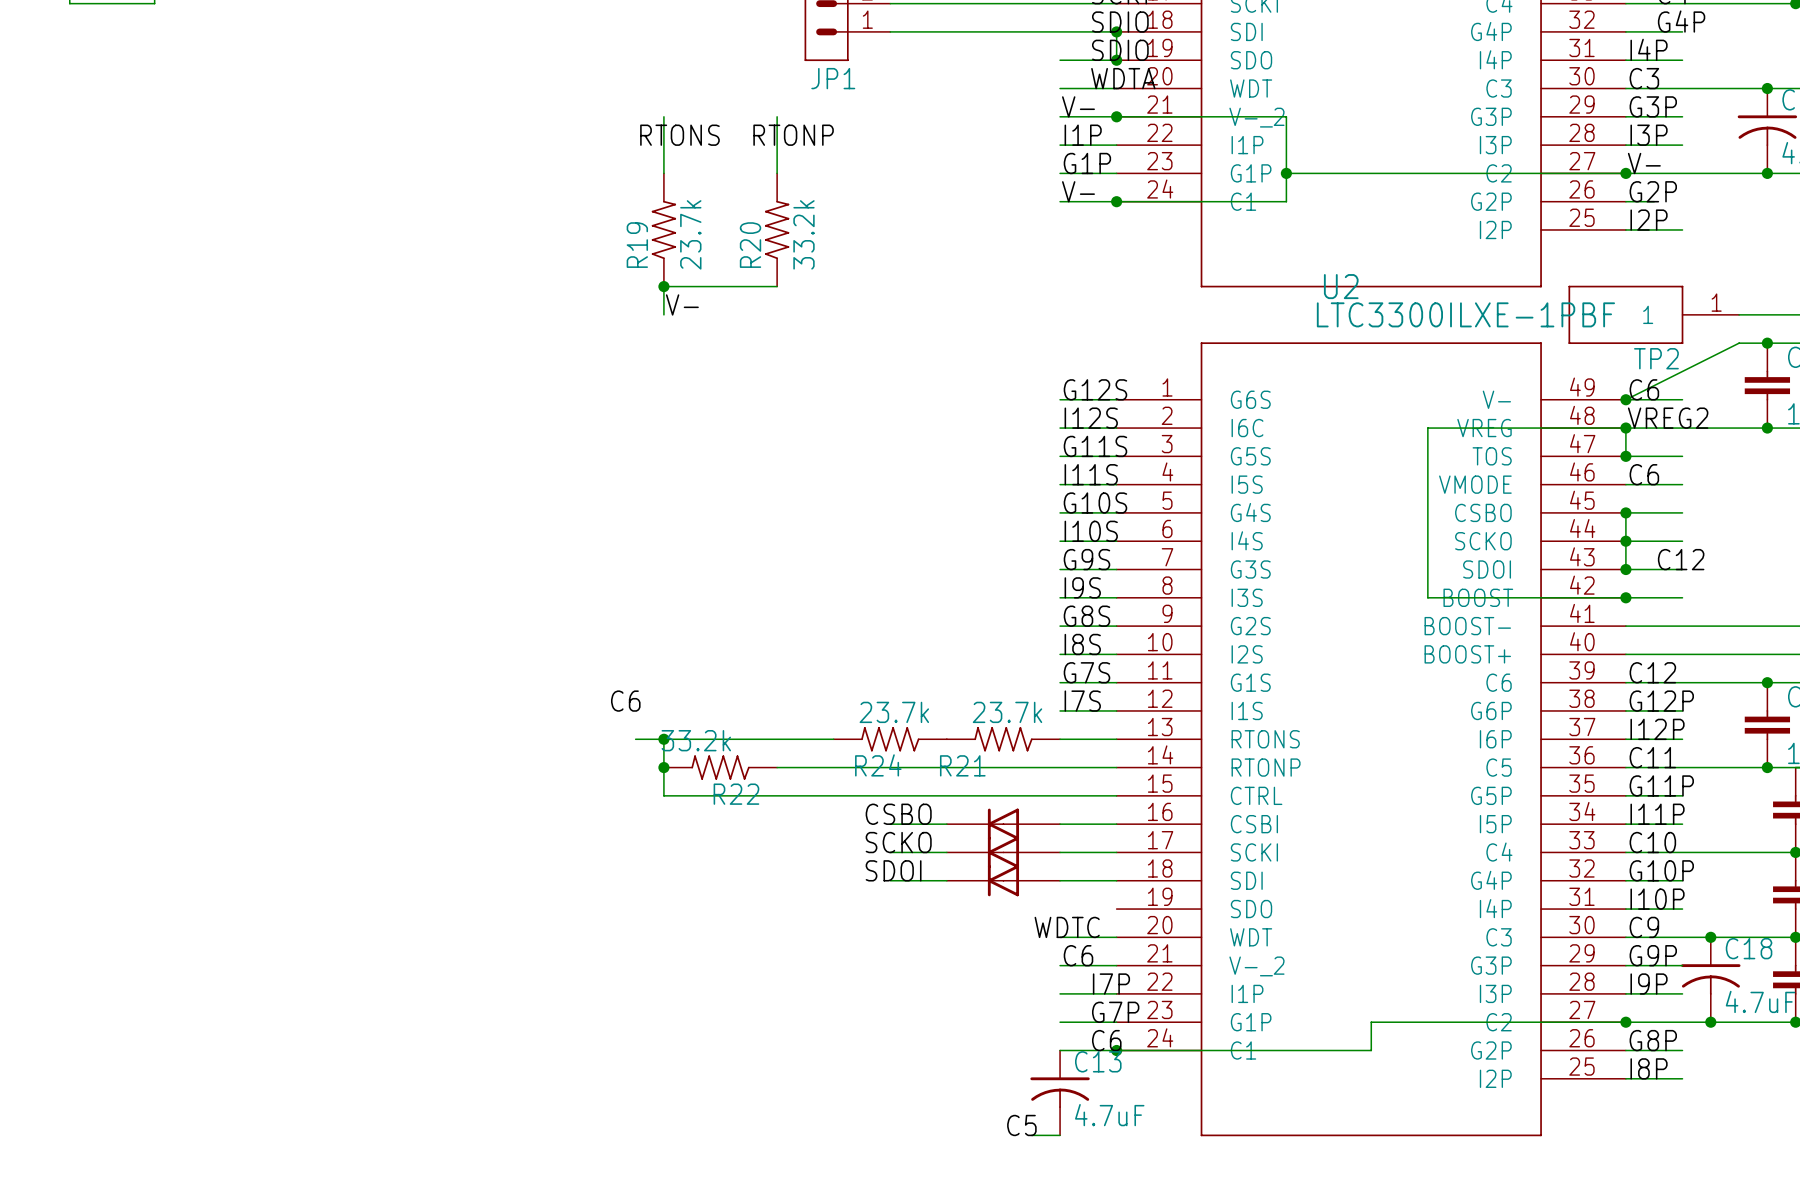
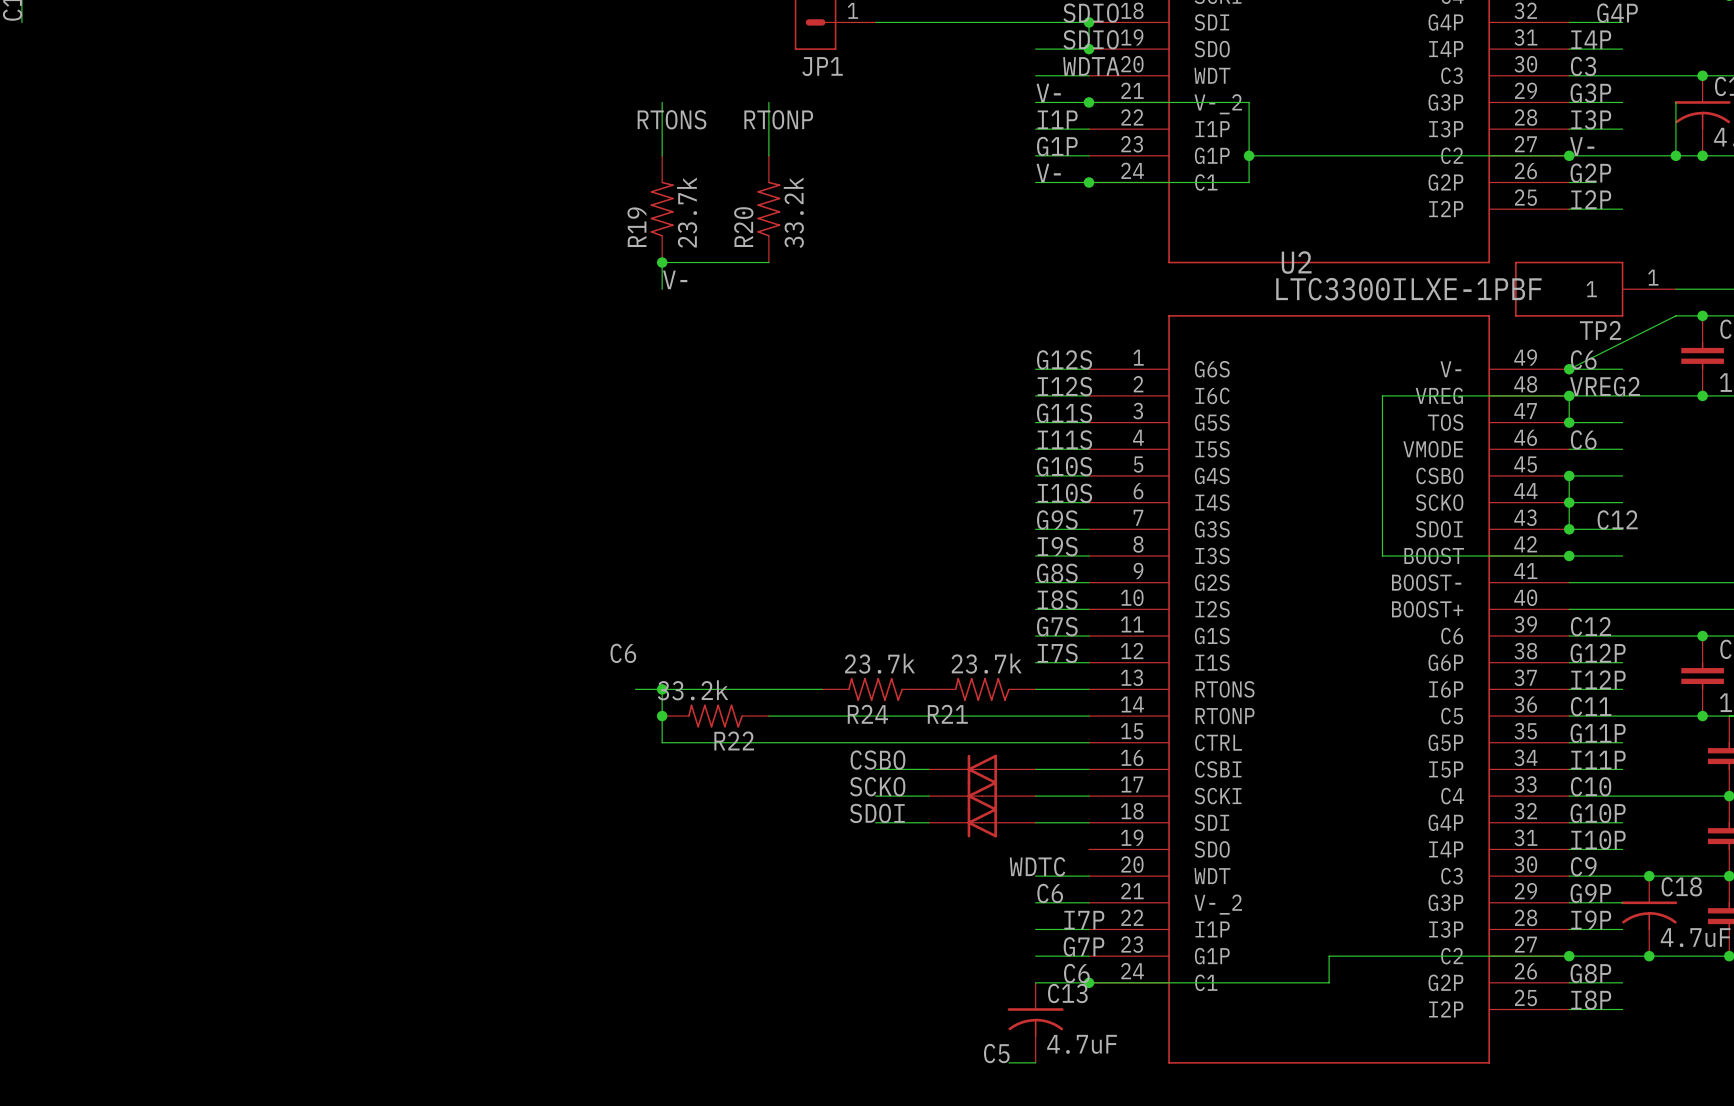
wire: none -> (1675, 102) (1675, 155)
junction: none -> (1675, 155)

